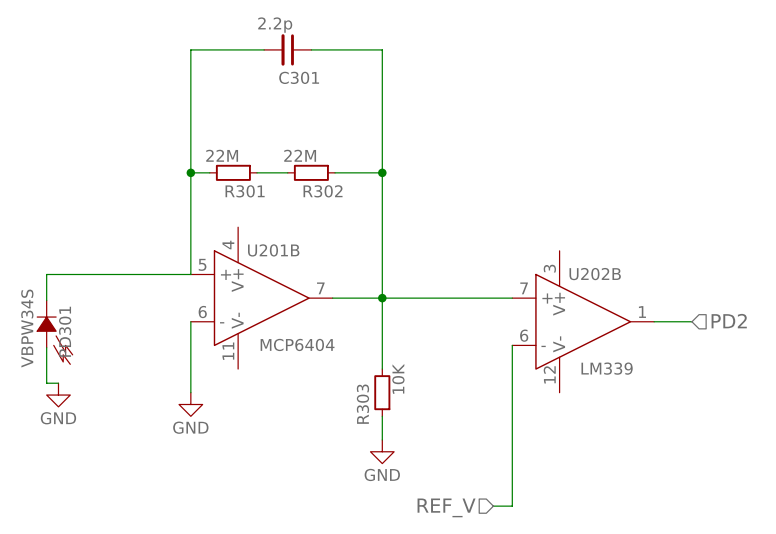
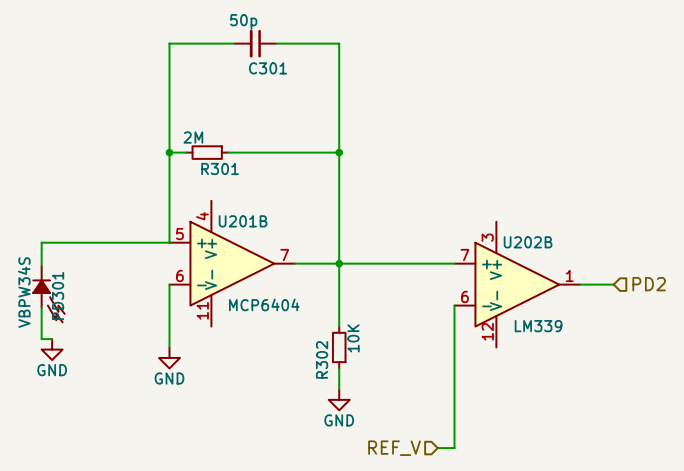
C301 value: 2.2p (275, 25) -> 50p (243, 21)
R301 value: 22M (222, 155) -> 2M (193, 137)
wire: none -> (255, 152) (297, 152)
R302: 22M (311, 172) -> none
R303 name: R303 (362, 404) -> R302 (322, 359)

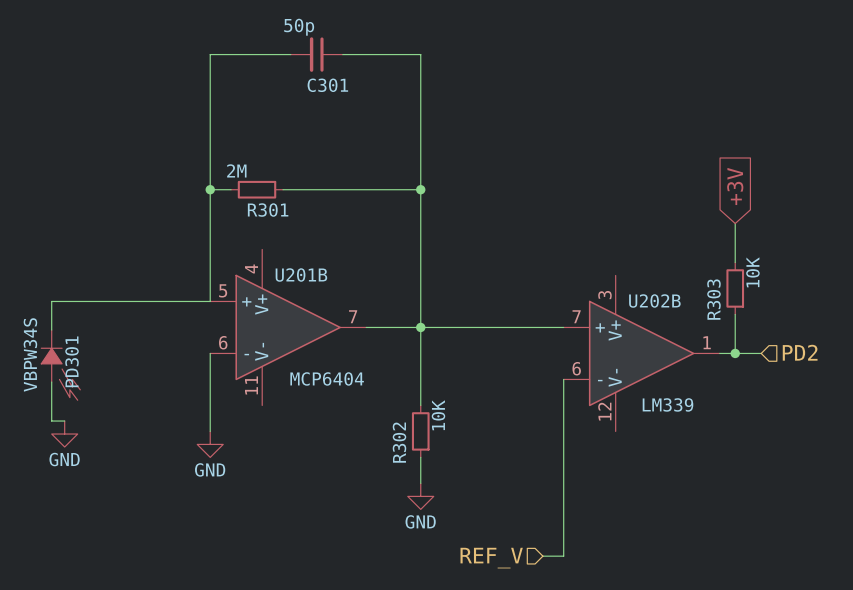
global label: none -> +3V (735, 186)
wire: none -> (735, 223) (735, 262)
R303: none -> 10K (735, 288)
wire: none -> (735, 314) (735, 353)
junction: none -> (735, 353)

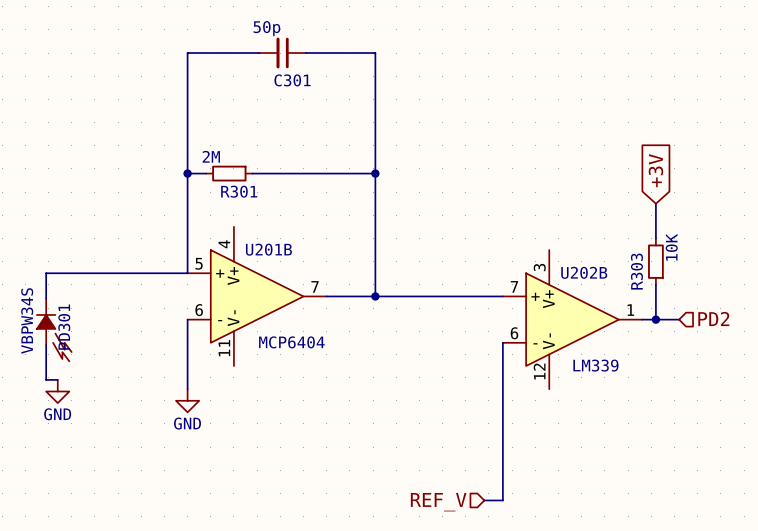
wire: (420, 327) (420, 405) -> none
R302: 10K (420, 431) -> none
wire: (420, 457) (420, 483) -> none
power symbol: GND (420, 496) -> none

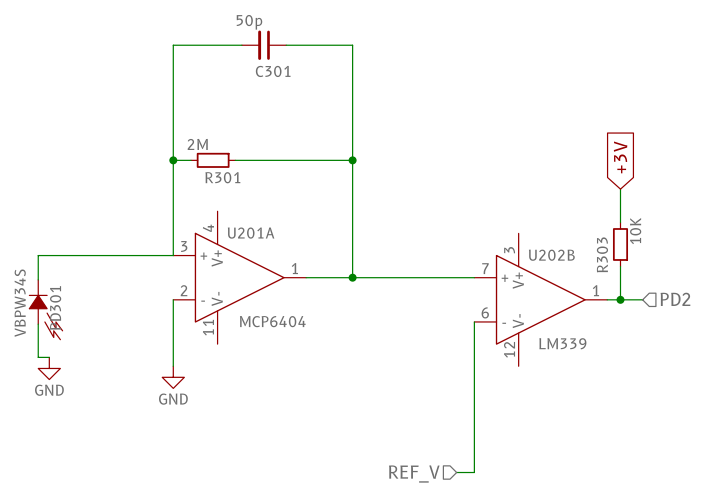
U201B name: U201B (268, 249) -> U201A (251, 233)
U201B pin number: 5 (199, 263) -> 3 (184, 246)
U201B pin number: 7 (315, 286) -> 1 (294, 268)
U201B pin number: 6 (199, 310) -> 2 (184, 290)

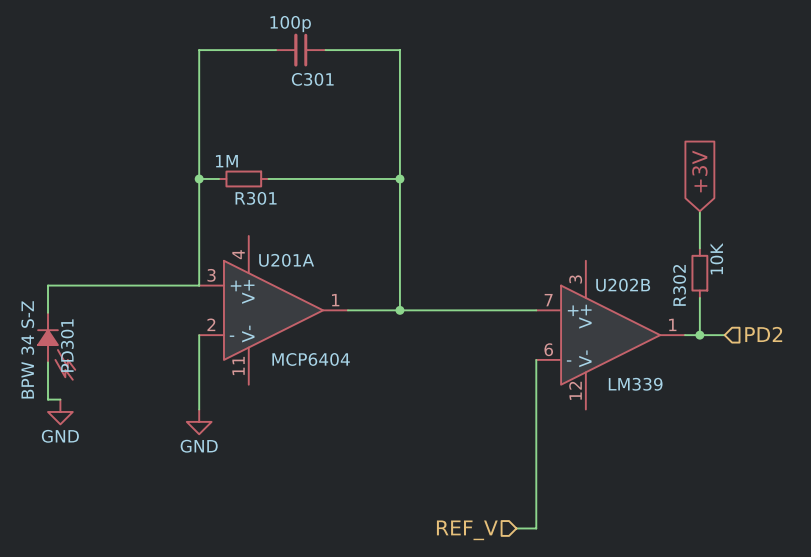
C301 value: 50p (249, 22) -> 100p (290, 24)
R301 value: 2M (197, 144) -> 1M (226, 161)
R303 name: R303 (602, 254) -> R302 (679, 285)
PD301 value: VBPW34S (20, 303) -> BPW 34 S-Z (27, 349)

